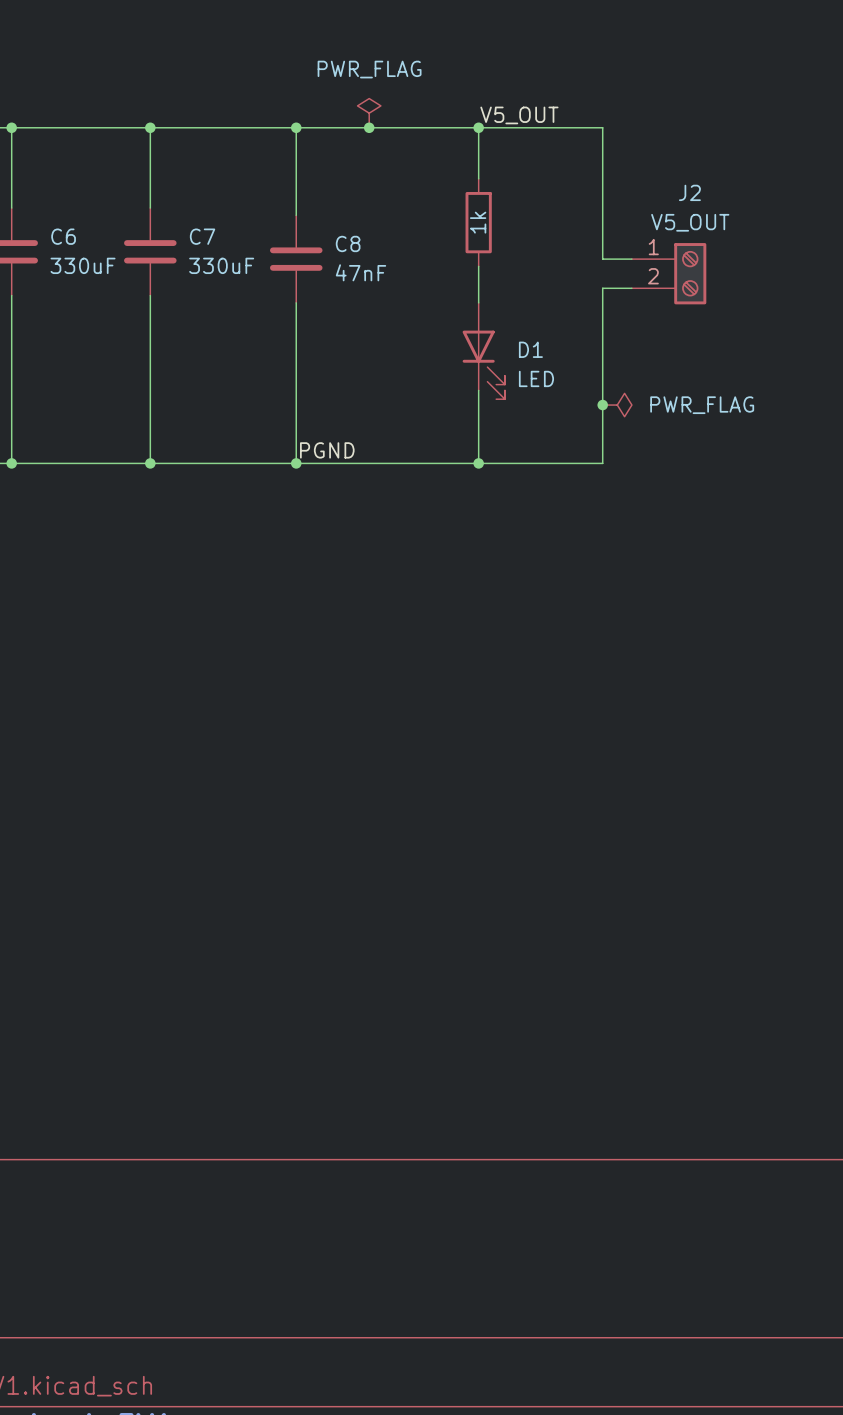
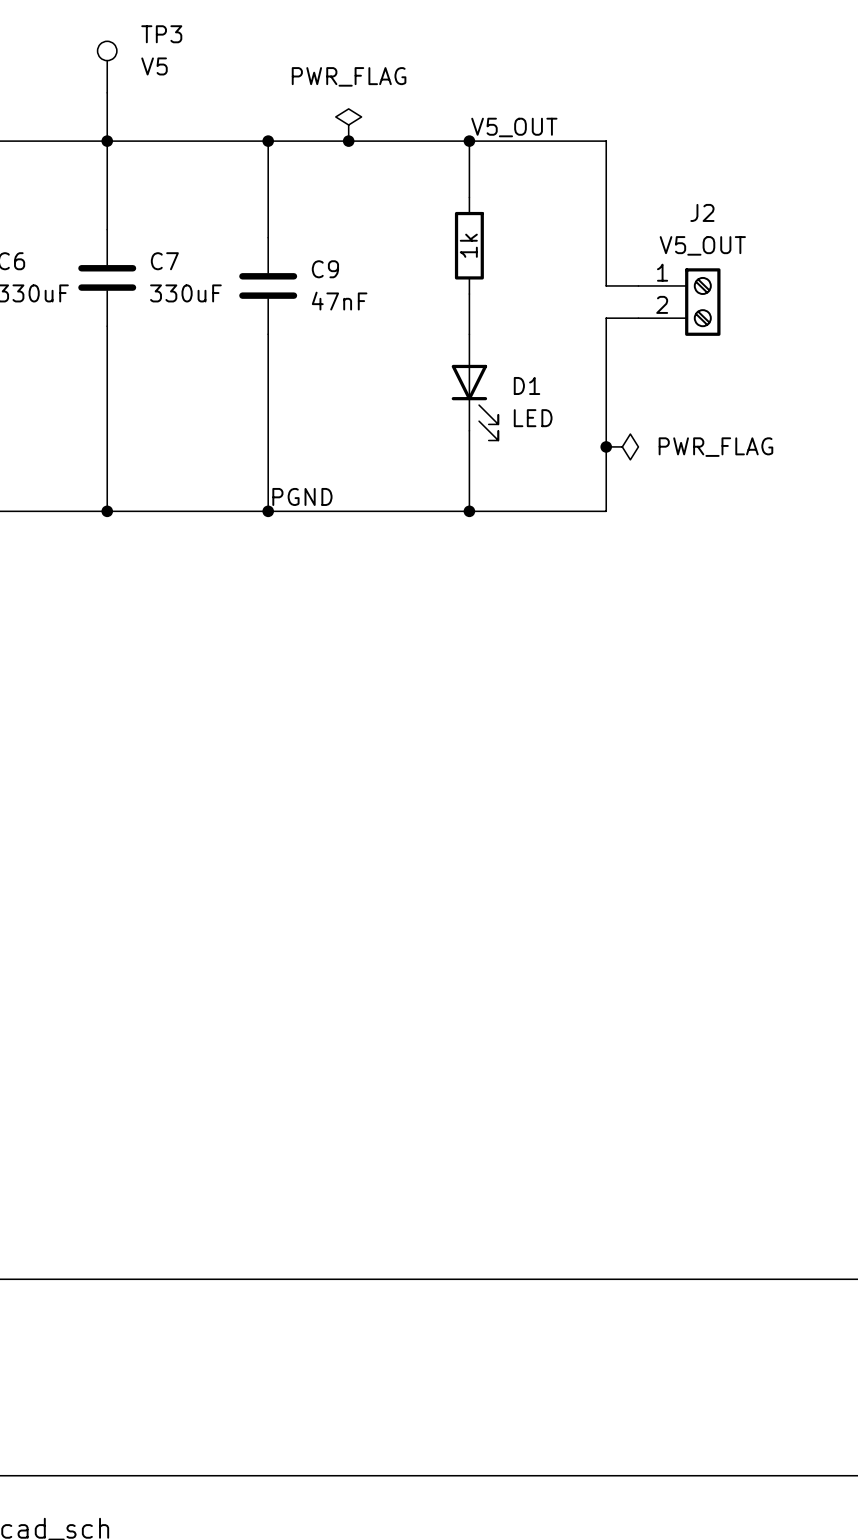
TP3: none -> V5 (107, 67)
wire: none -> (107, 92) (107, 141)
C8 name: C8 (348, 243) -> C9 (325, 269)

